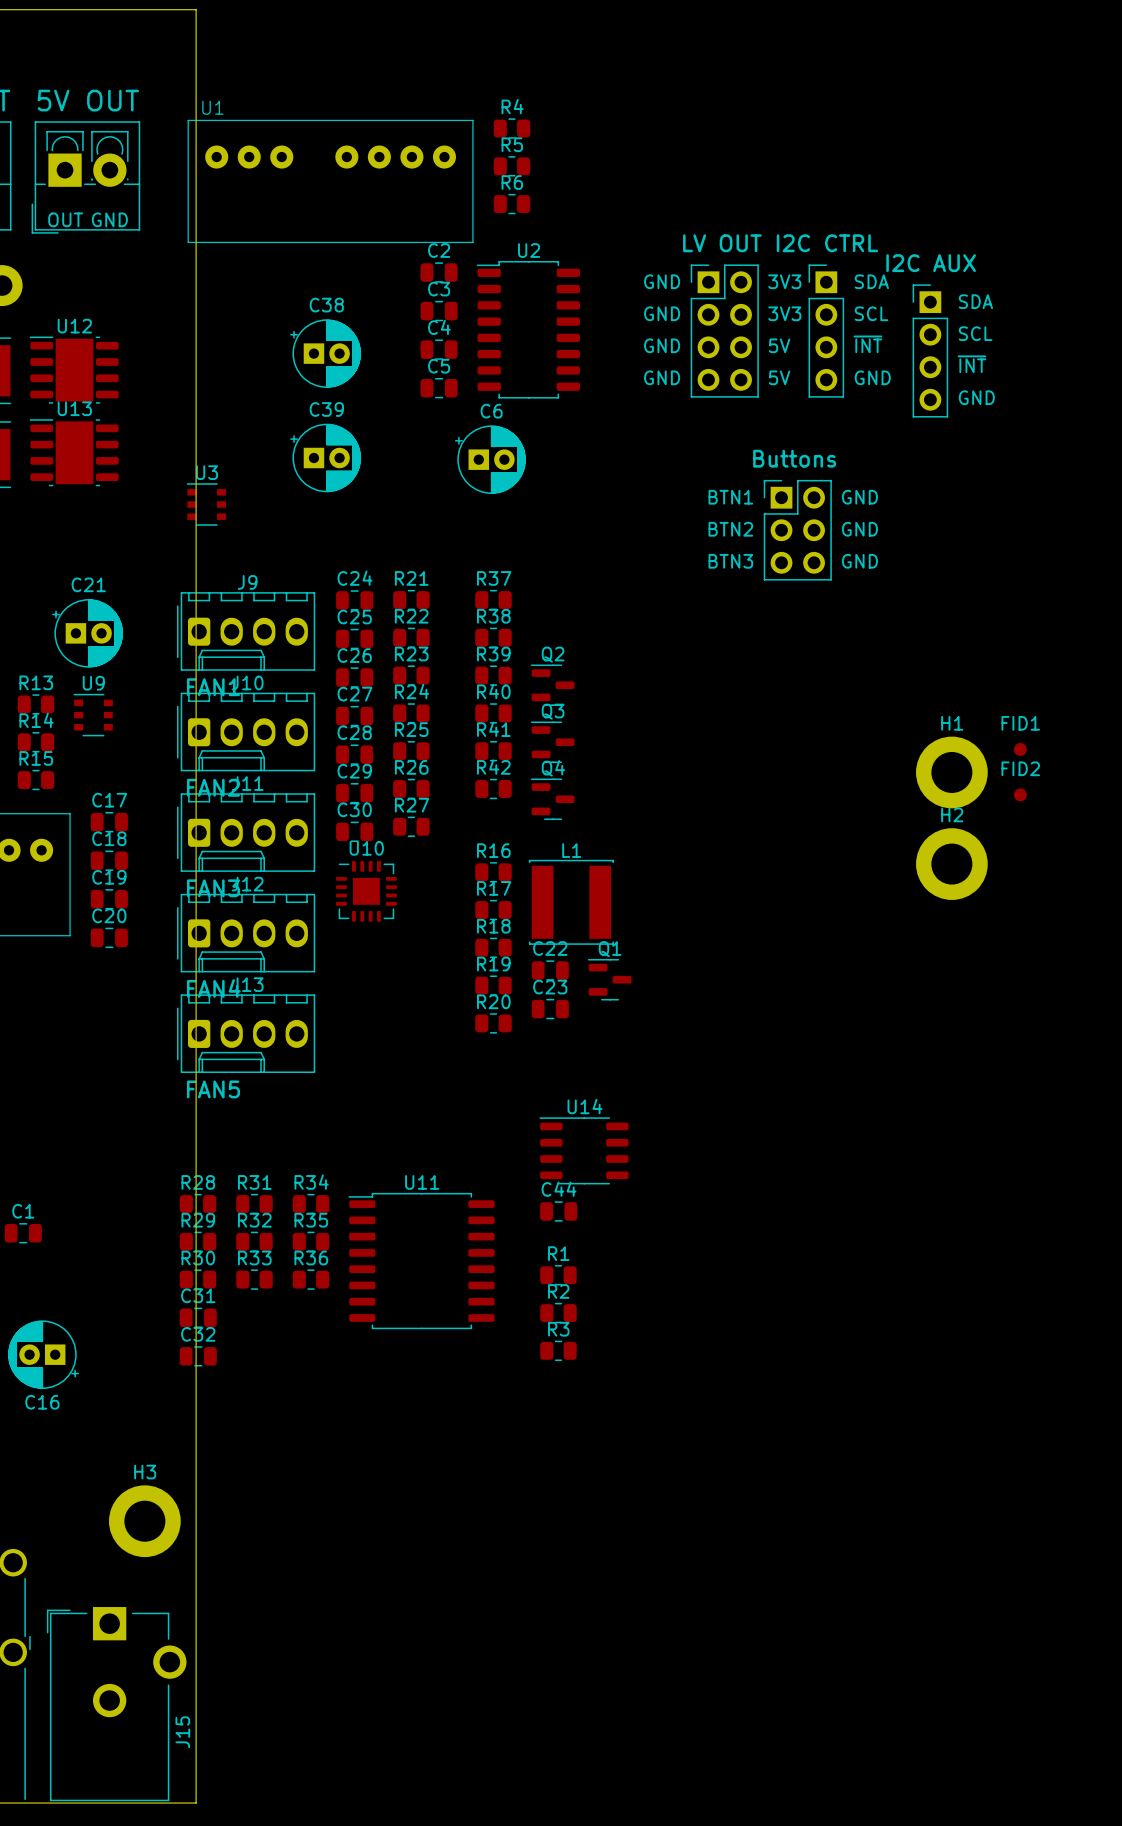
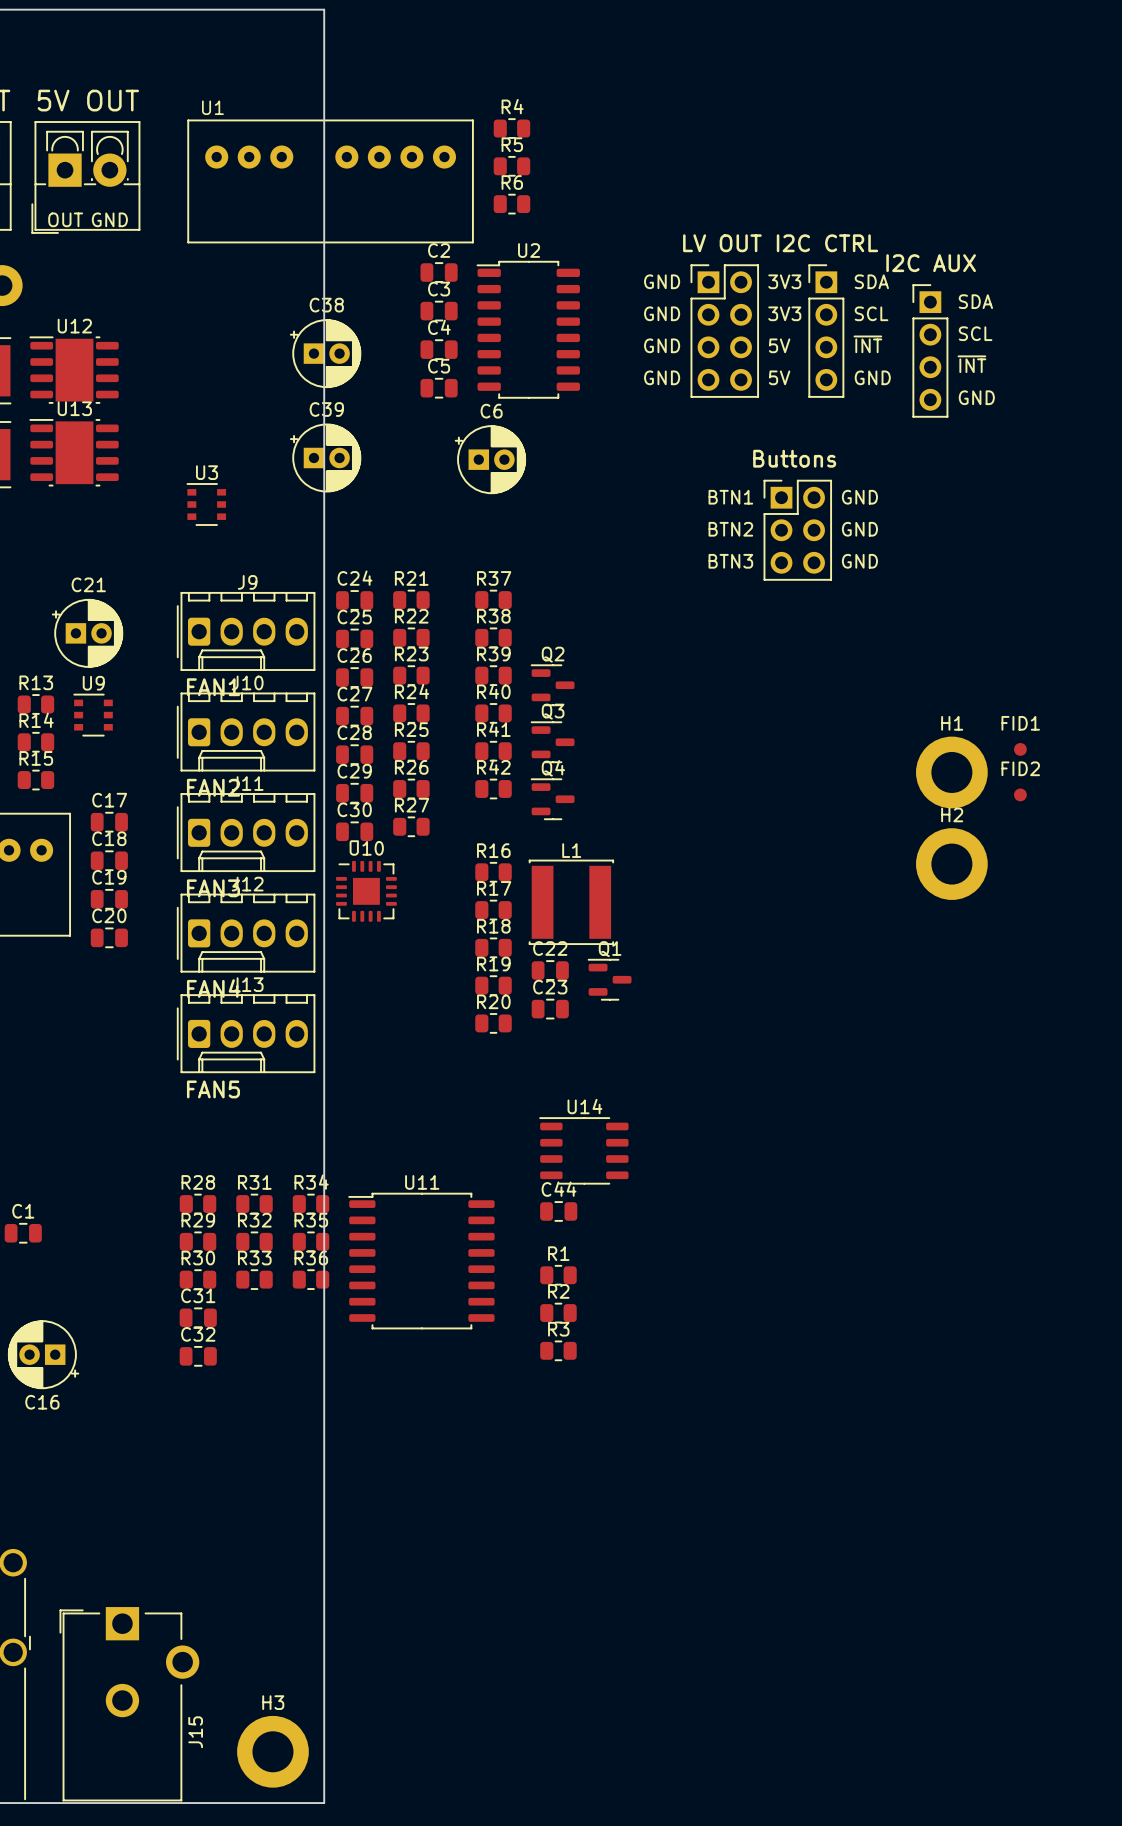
board edge: (196, 9) (196, 1803) -> (196, 9) (324, 9) (324, 1803) (196, 1803)
H3 position: (144, 1521) -> (272, 1751)
J15 position: (116, 1704) -> (129, 1704)

